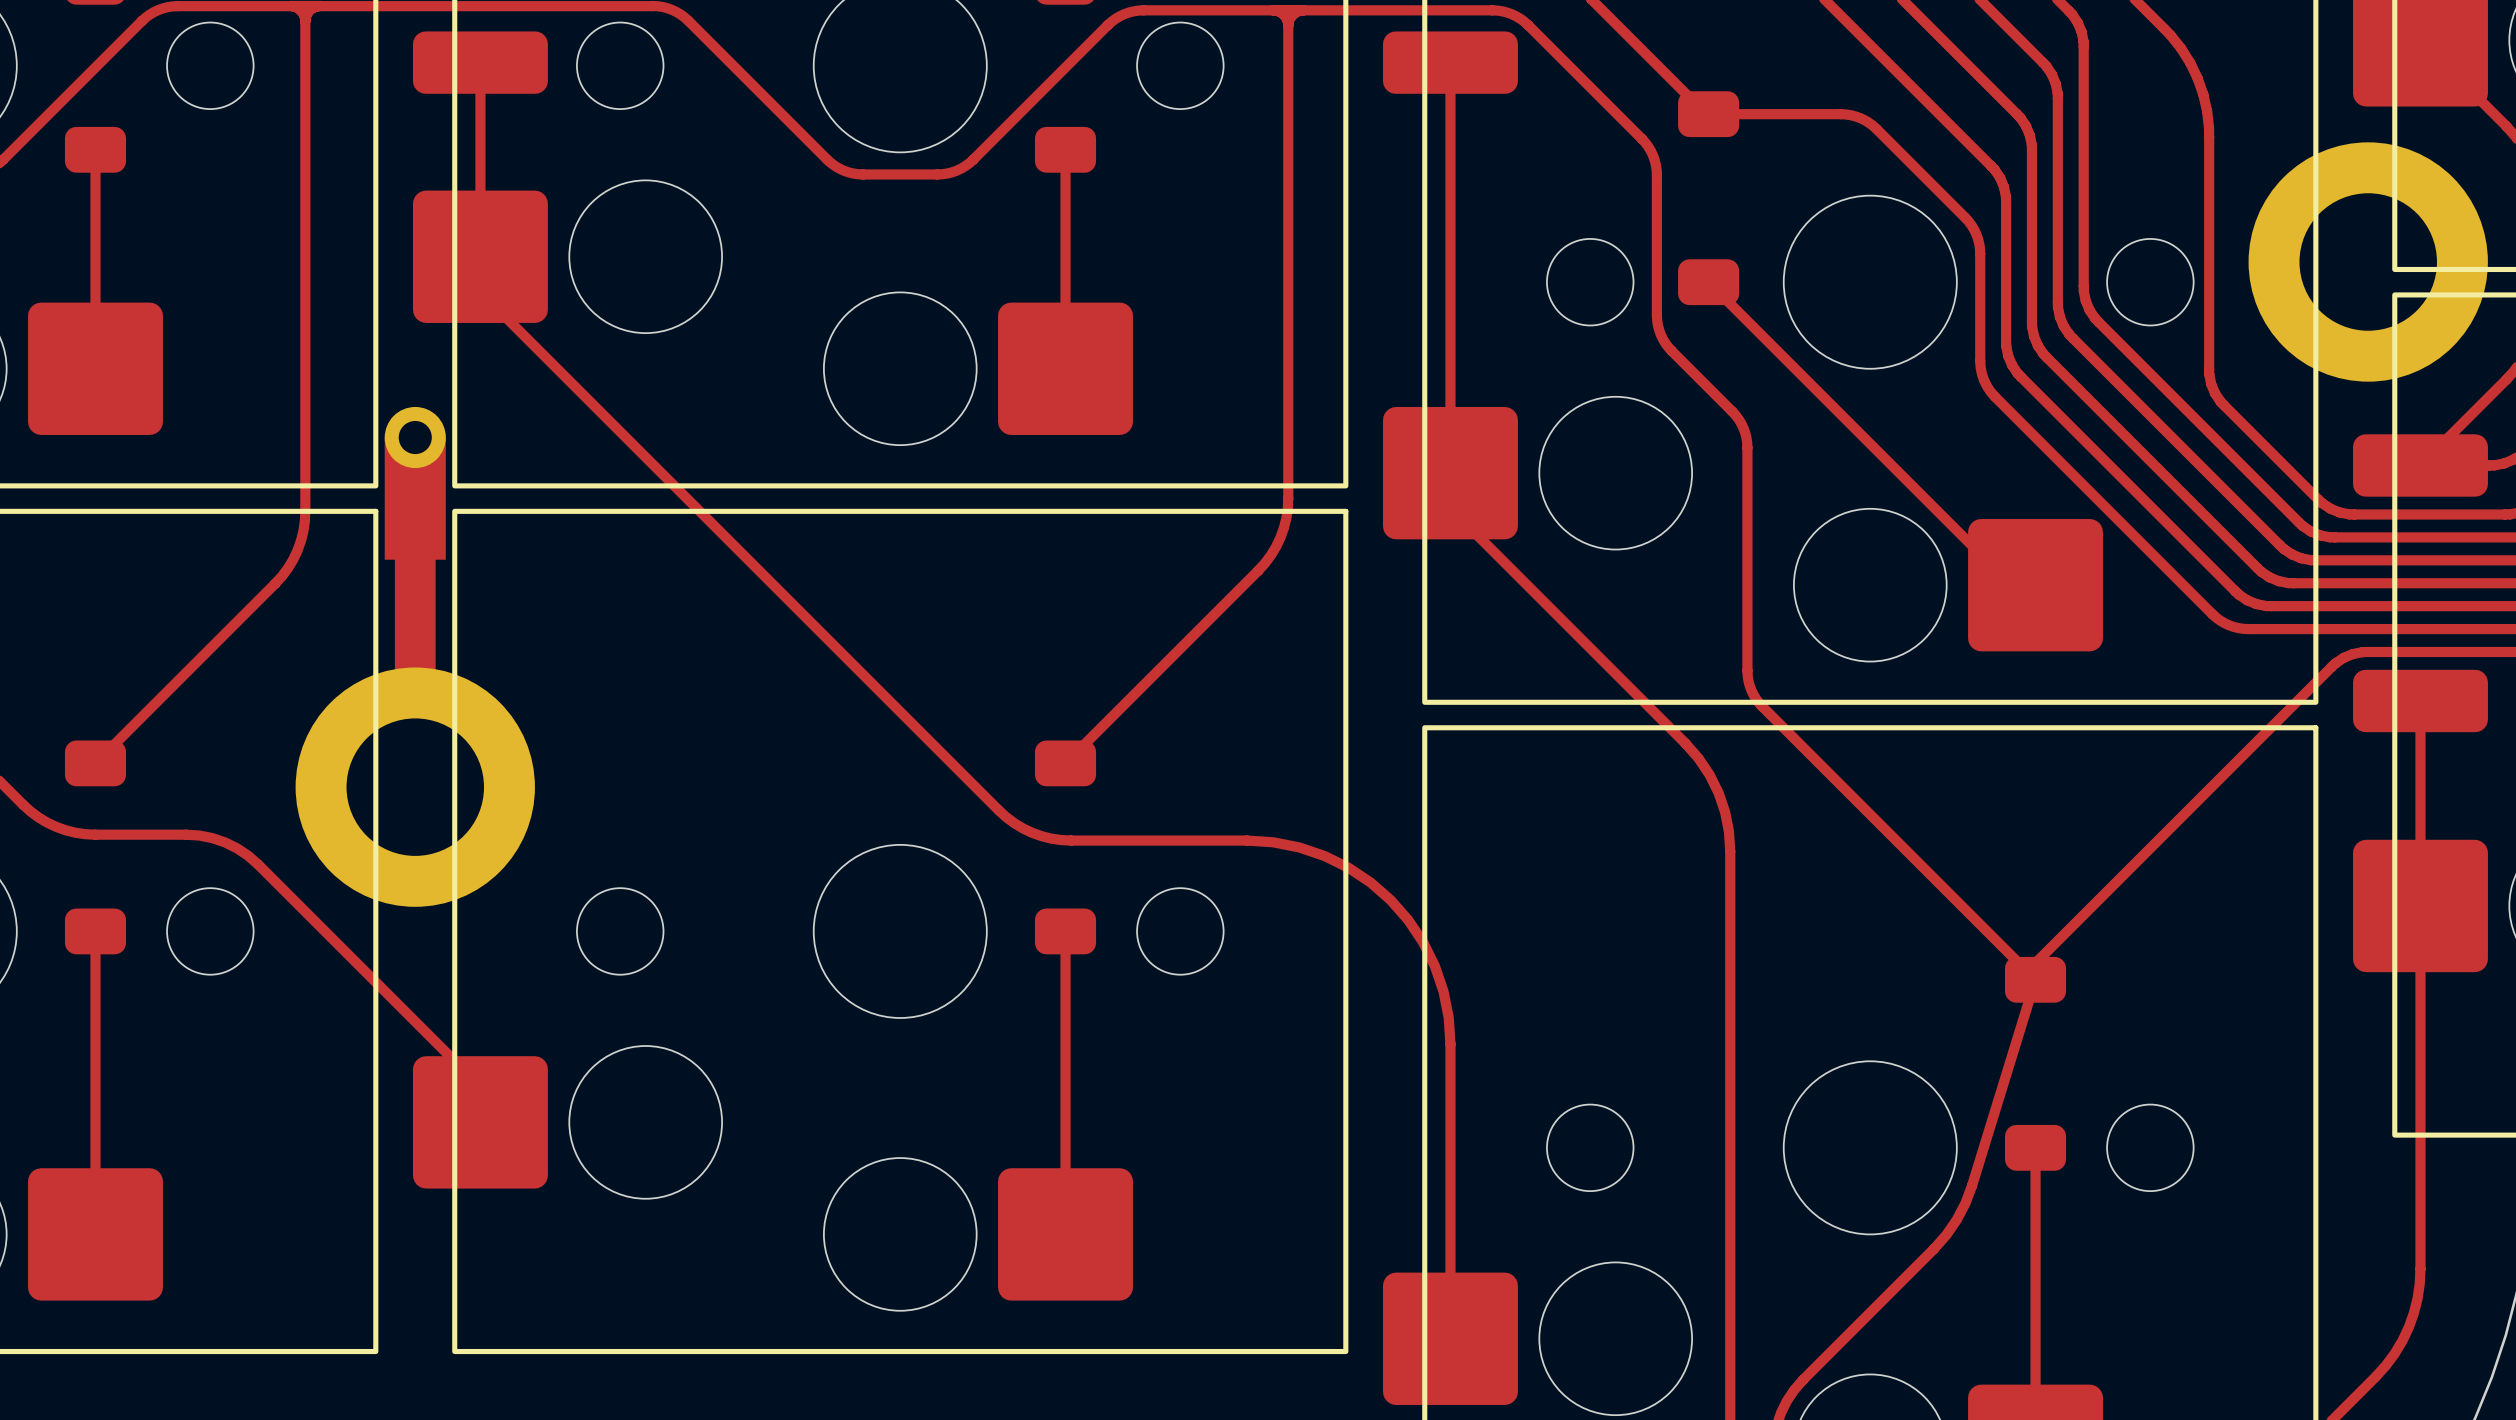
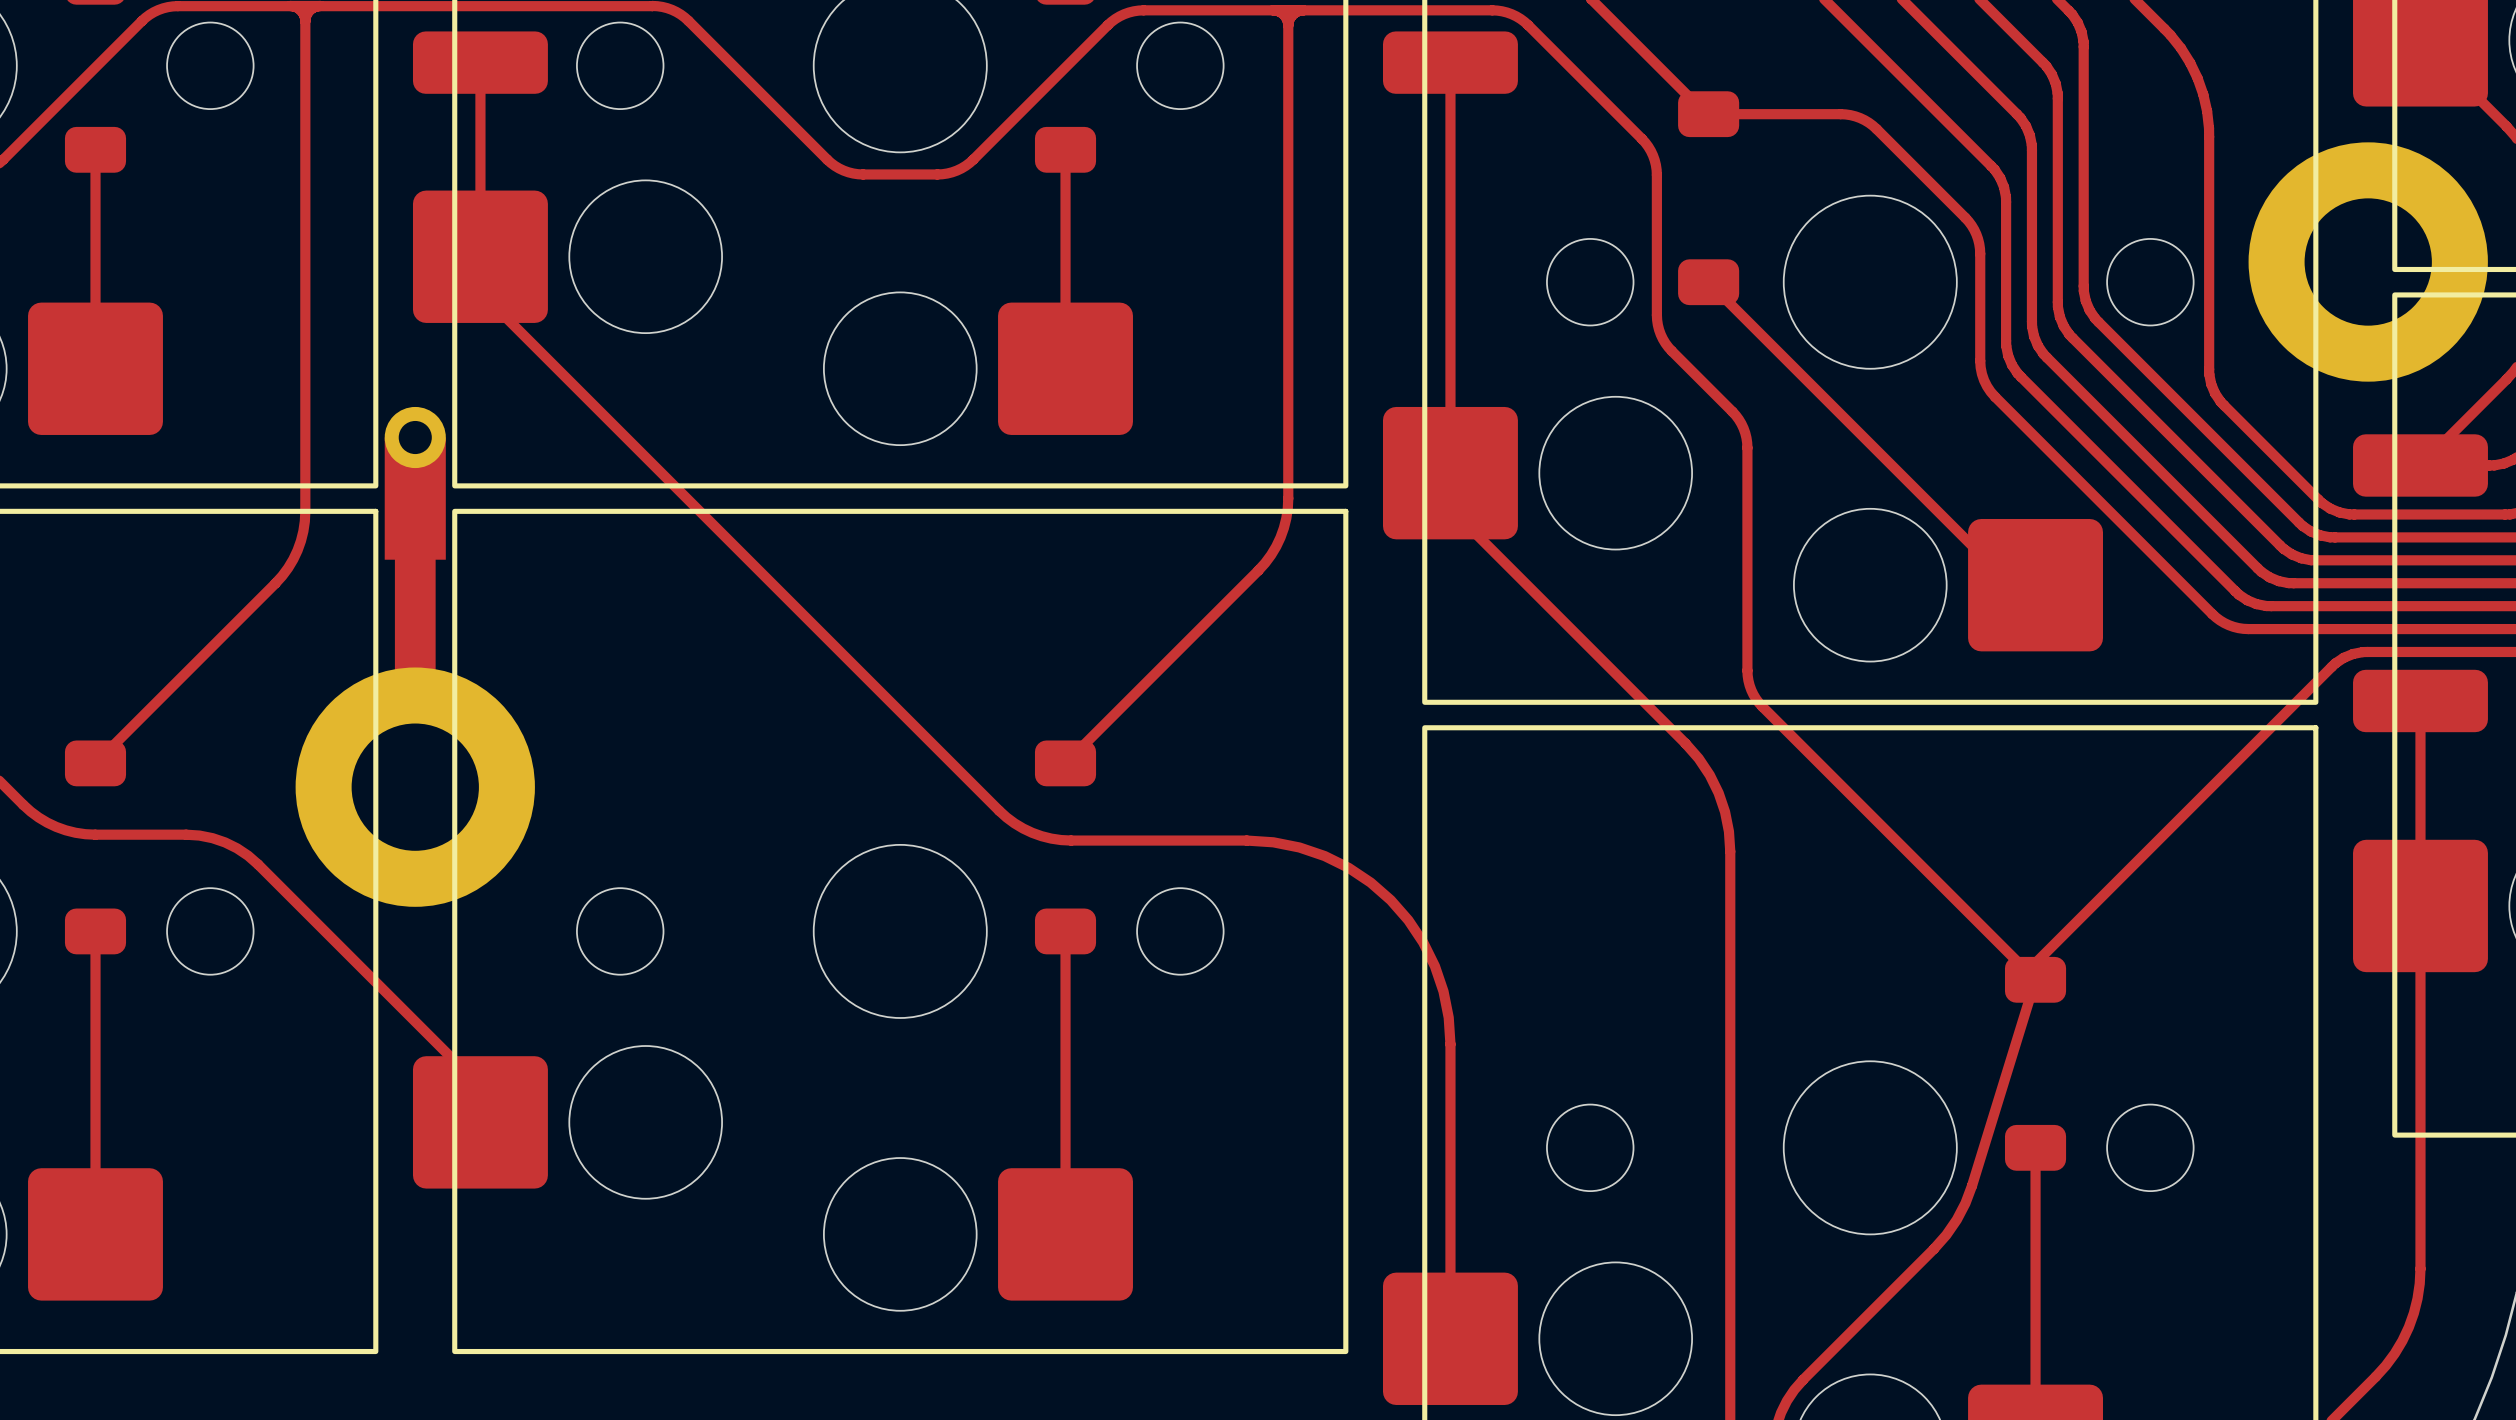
part footprint: [2248, 142, 2488, 382] -> [2248, 142, 2488, 382]
part footprint: [295, 667, 535, 907] -> [295, 667, 535, 907]

